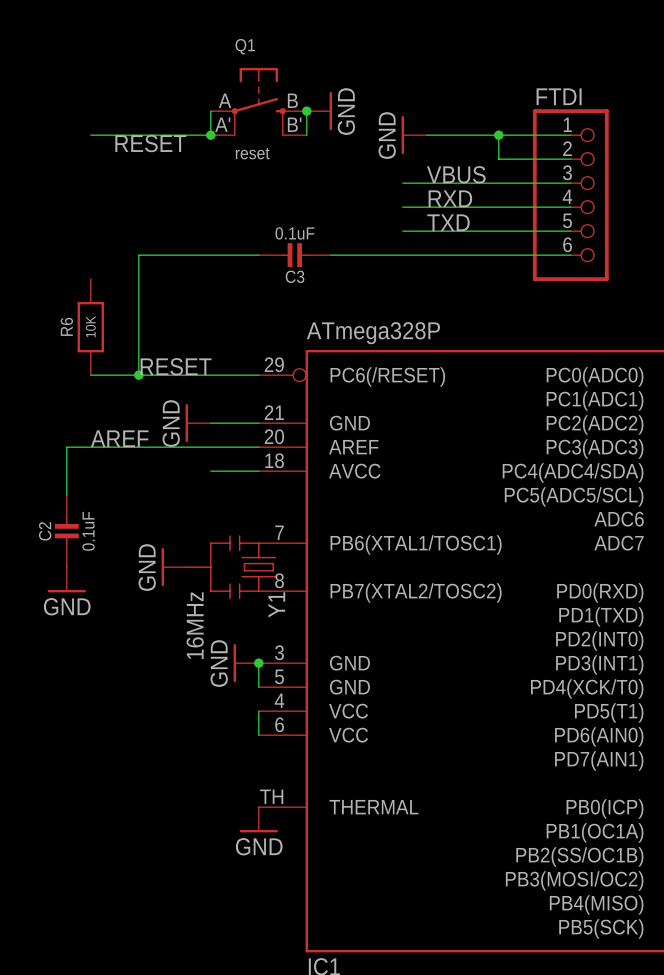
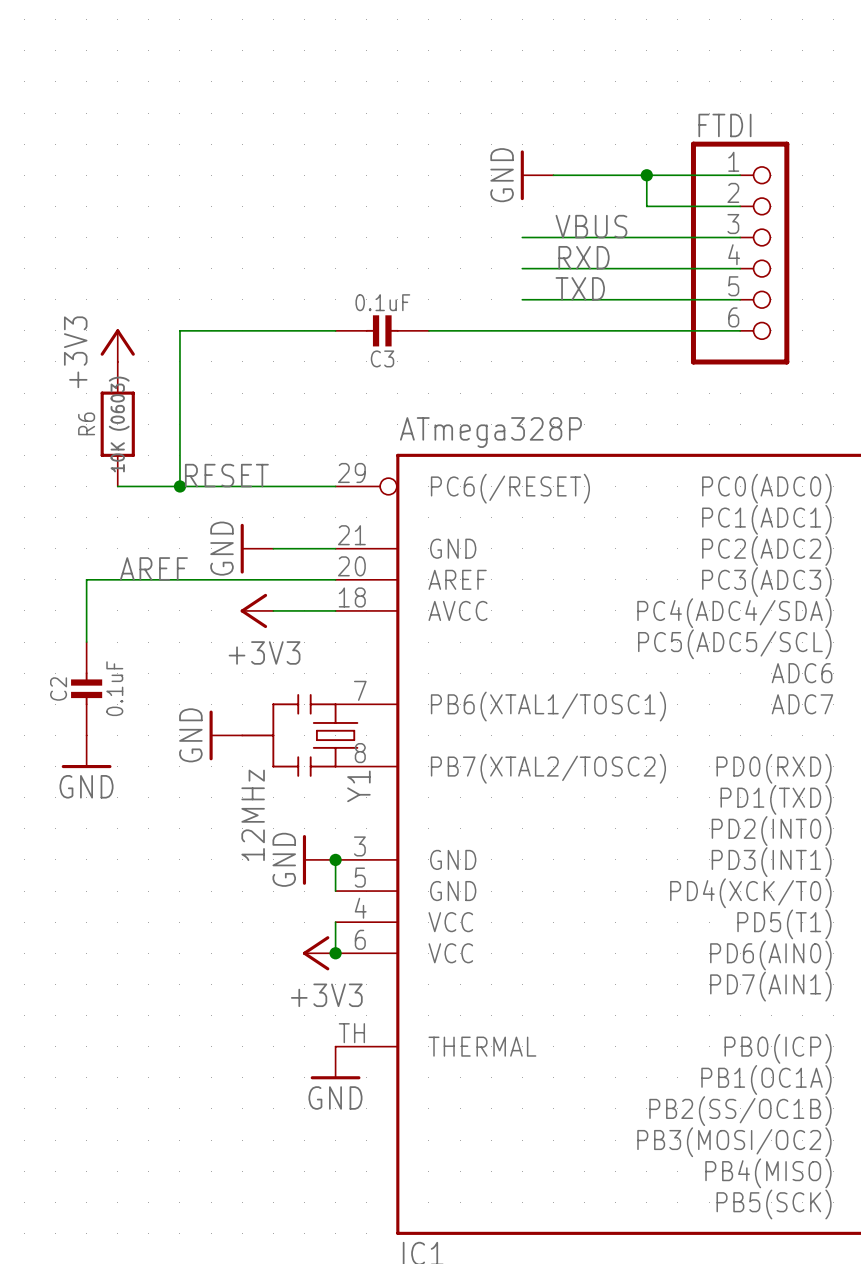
Q1: reset (258, 101) -> none
wire: (210, 111) (210, 135) (90, 135) -> none
wire: (306, 111) (306, 135) -> none
junction: (306, 111) -> none
power symbol: GND (319, 111) -> none
junction: (210, 135) -> none
label: RESET (150, 143) -> none
power symbol: none -> +3V3 (117, 345)
R6 value: 10K (90, 326) -> 10K (0603) (119, 424)
power symbol: none -> +3V3 (257, 610)
Y1 value: 16MHz (195, 625) -> 12MHz (253, 815)
power symbol: none -> +3V3 (319, 953)
junction: none -> (335, 953)

